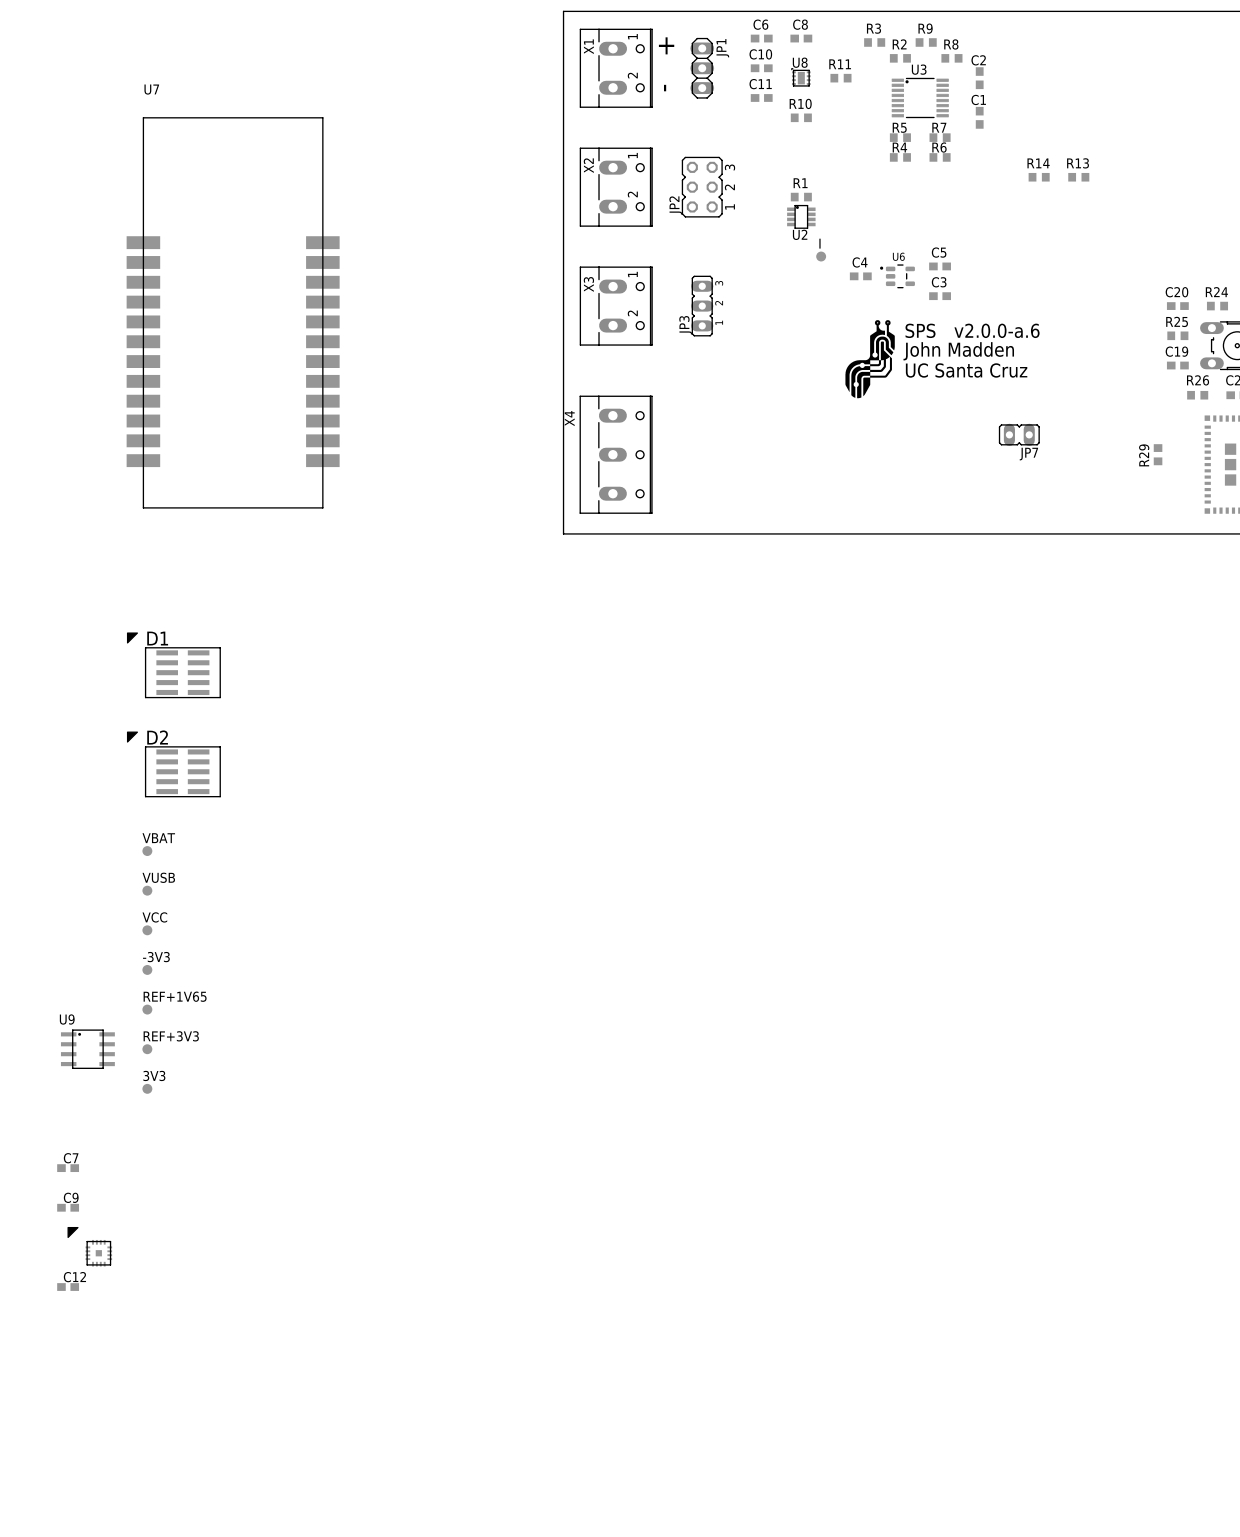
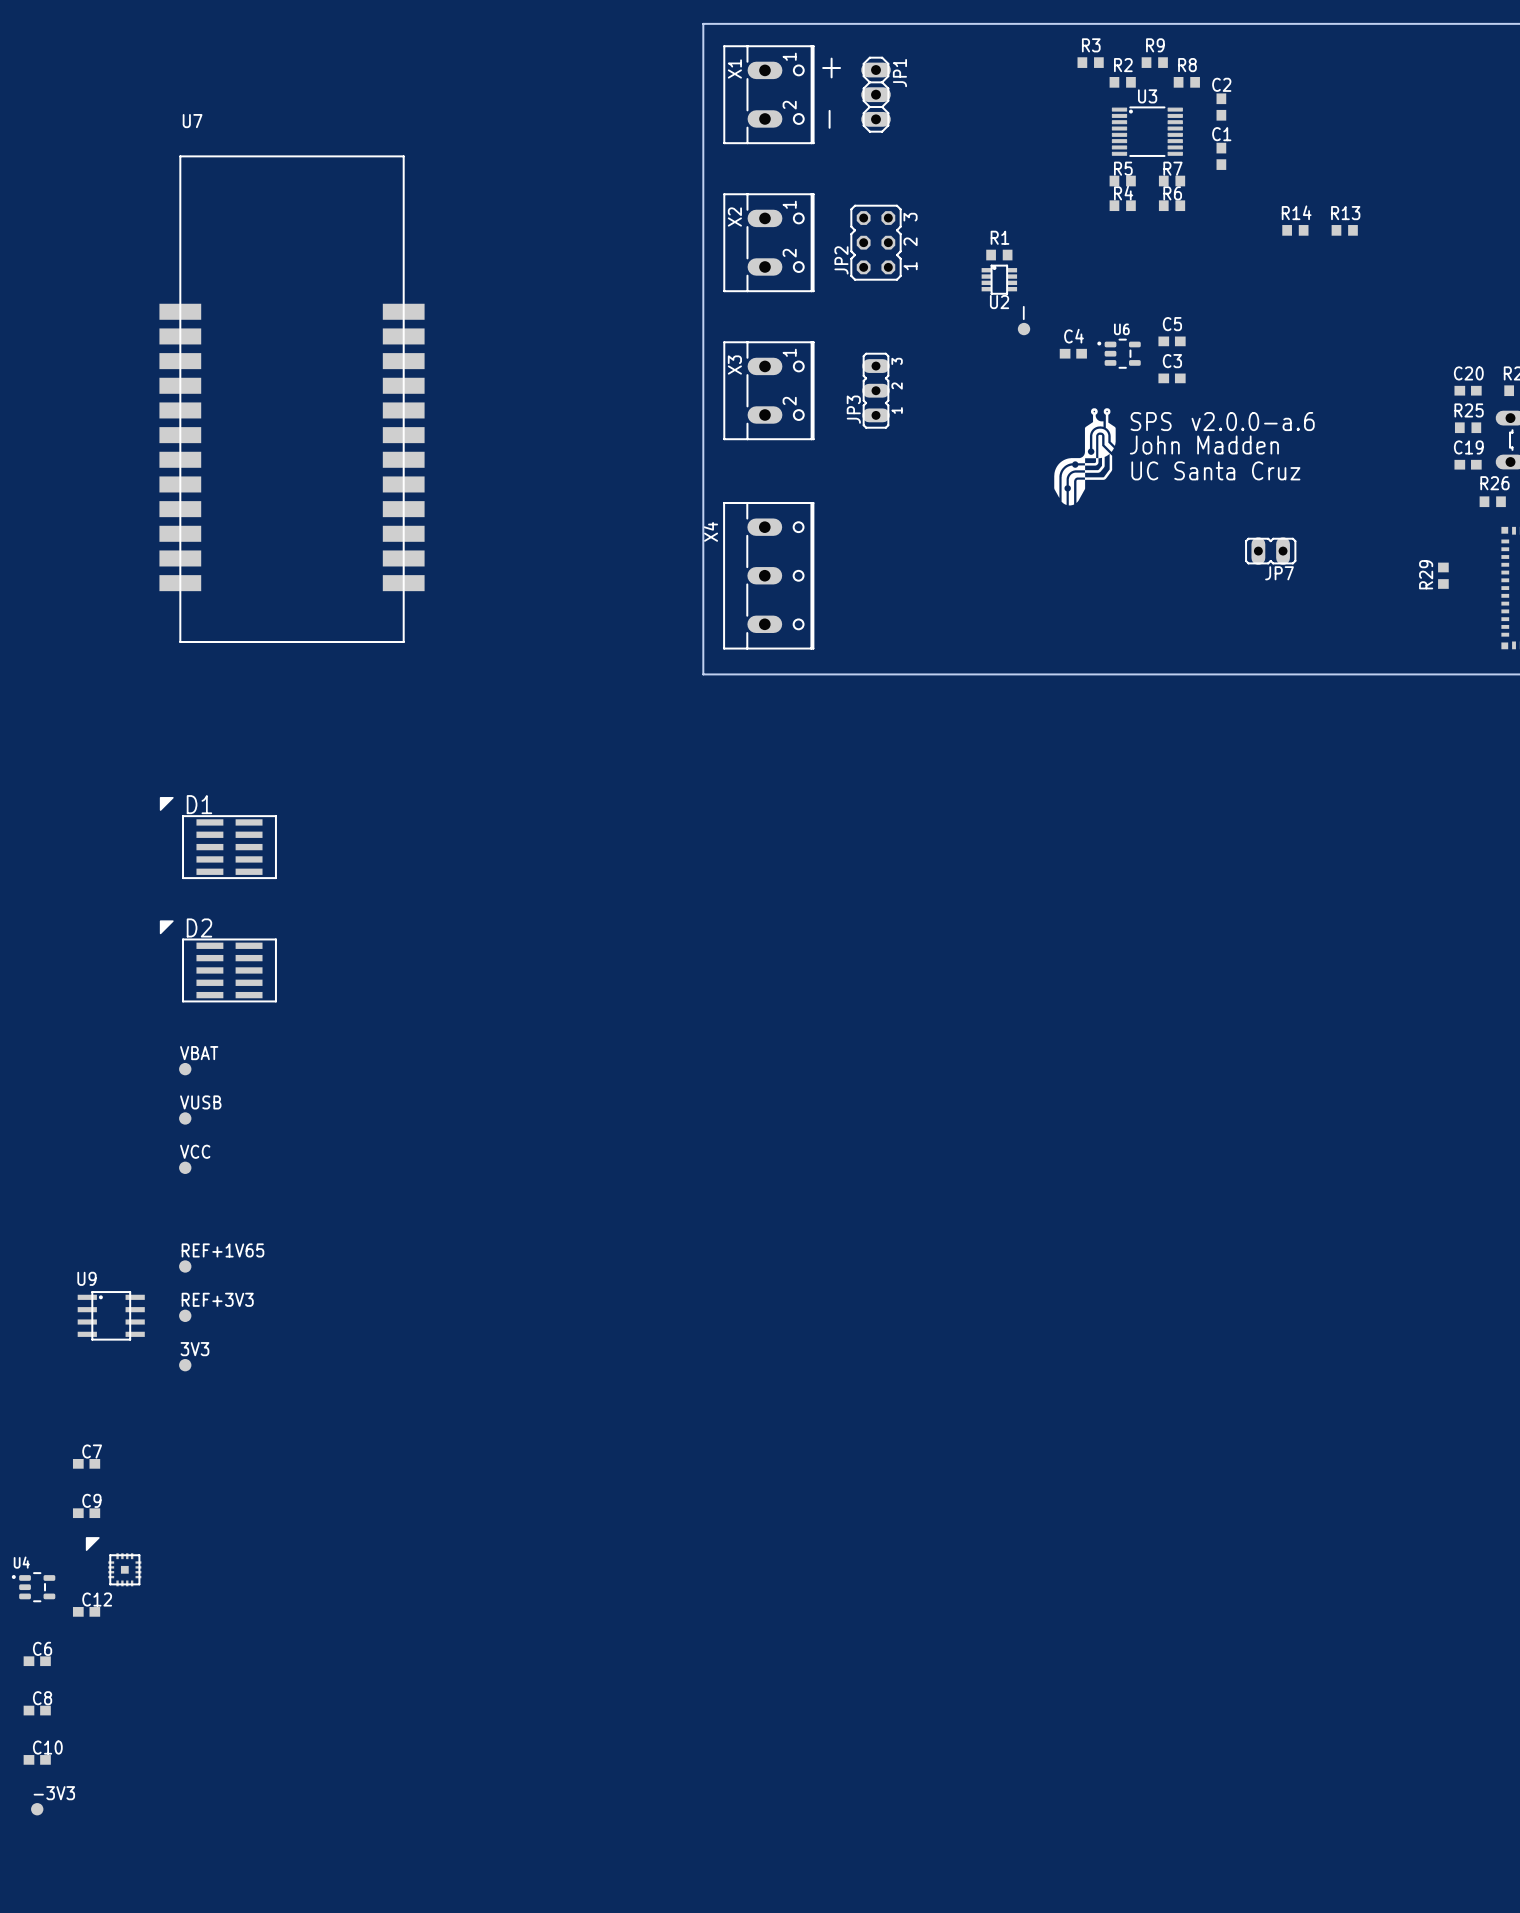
C6 name position: C6 (760, 24) -> C6 (42, 1648)
C8 name position: C8 (800, 24) -> C8 (42, 1698)
C6 position: (761, 38) -> (37, 1661)
C8 position: (801, 38) -> (37, 1710)
C10 name position: C10 (760, 54) -> C10 (47, 1747)
C10 position: (761, 68) -> (37, 1759)
U8: (800, 77) -> none
R11: (840, 78) -> none
C11: (761, 97) -> none
R10: (801, 117) -> none
-3V3 position: (147, 969) -> (37, 1809)
U4: none -> (33, 1587)

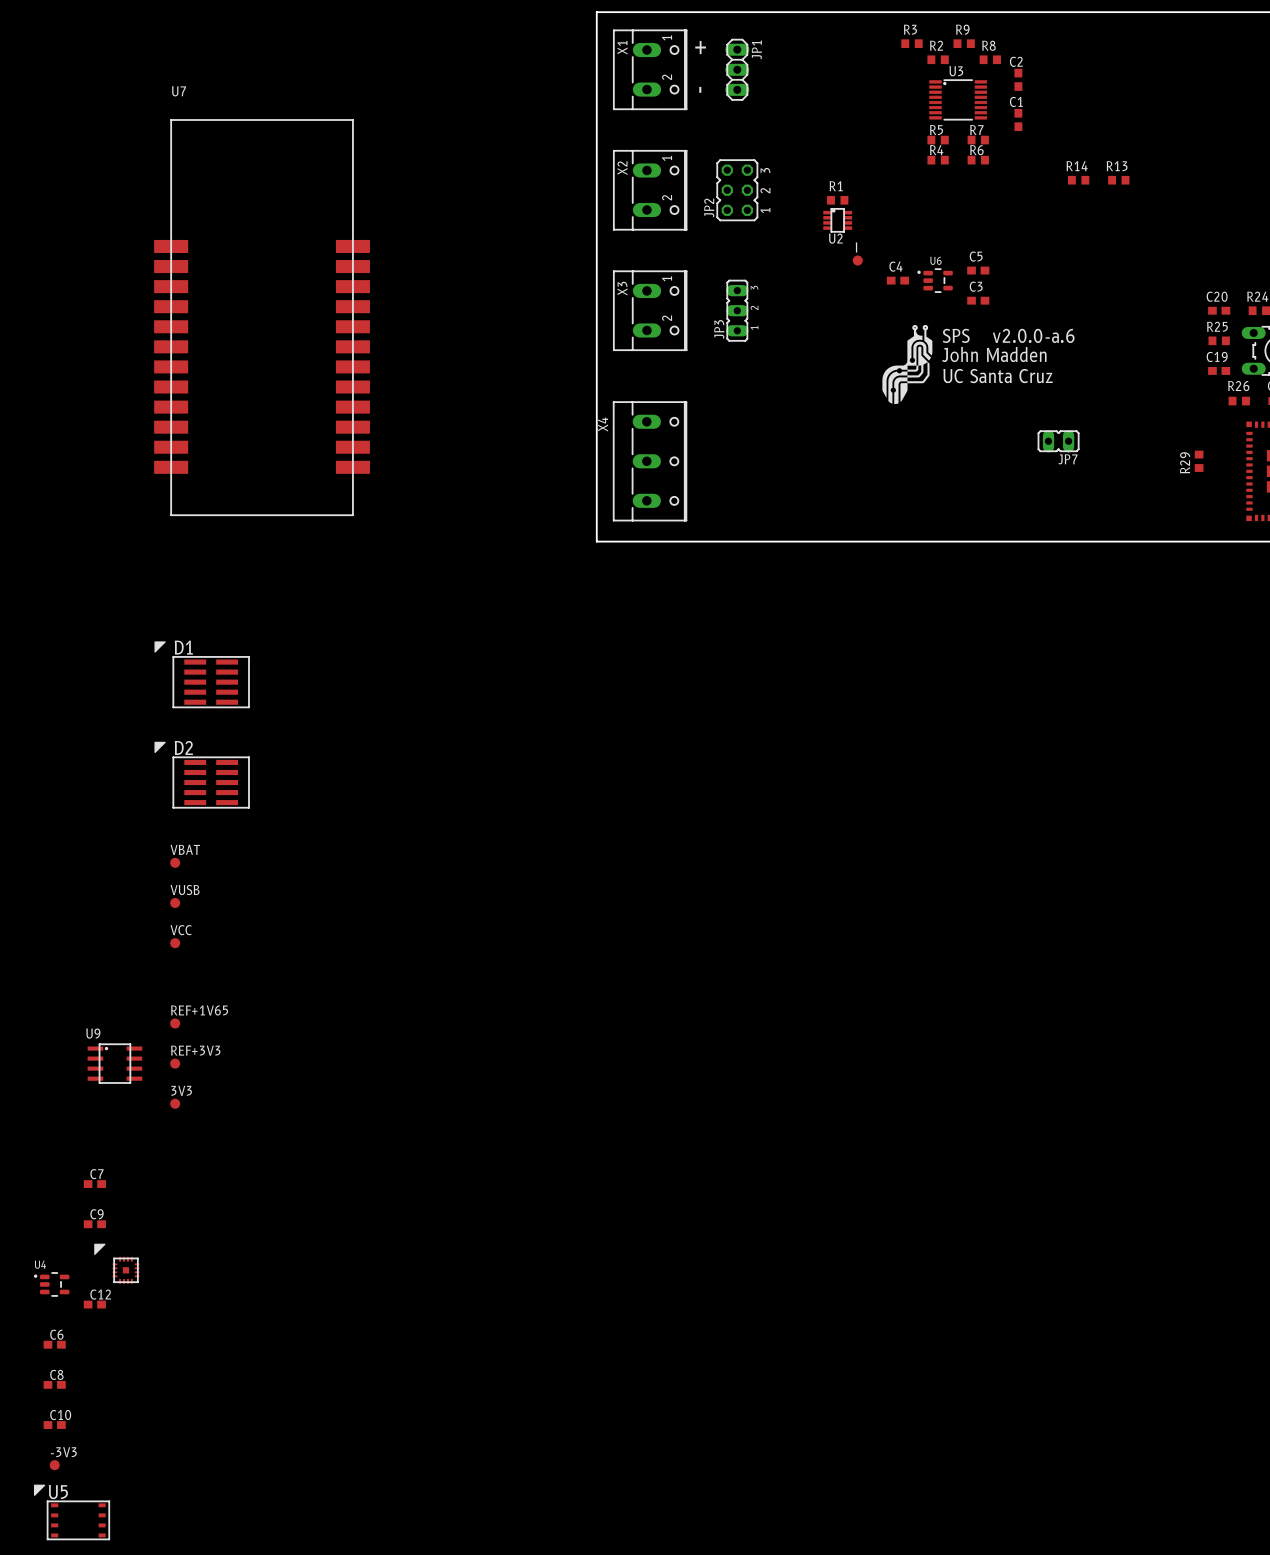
U5: none -> (71, 1512)

